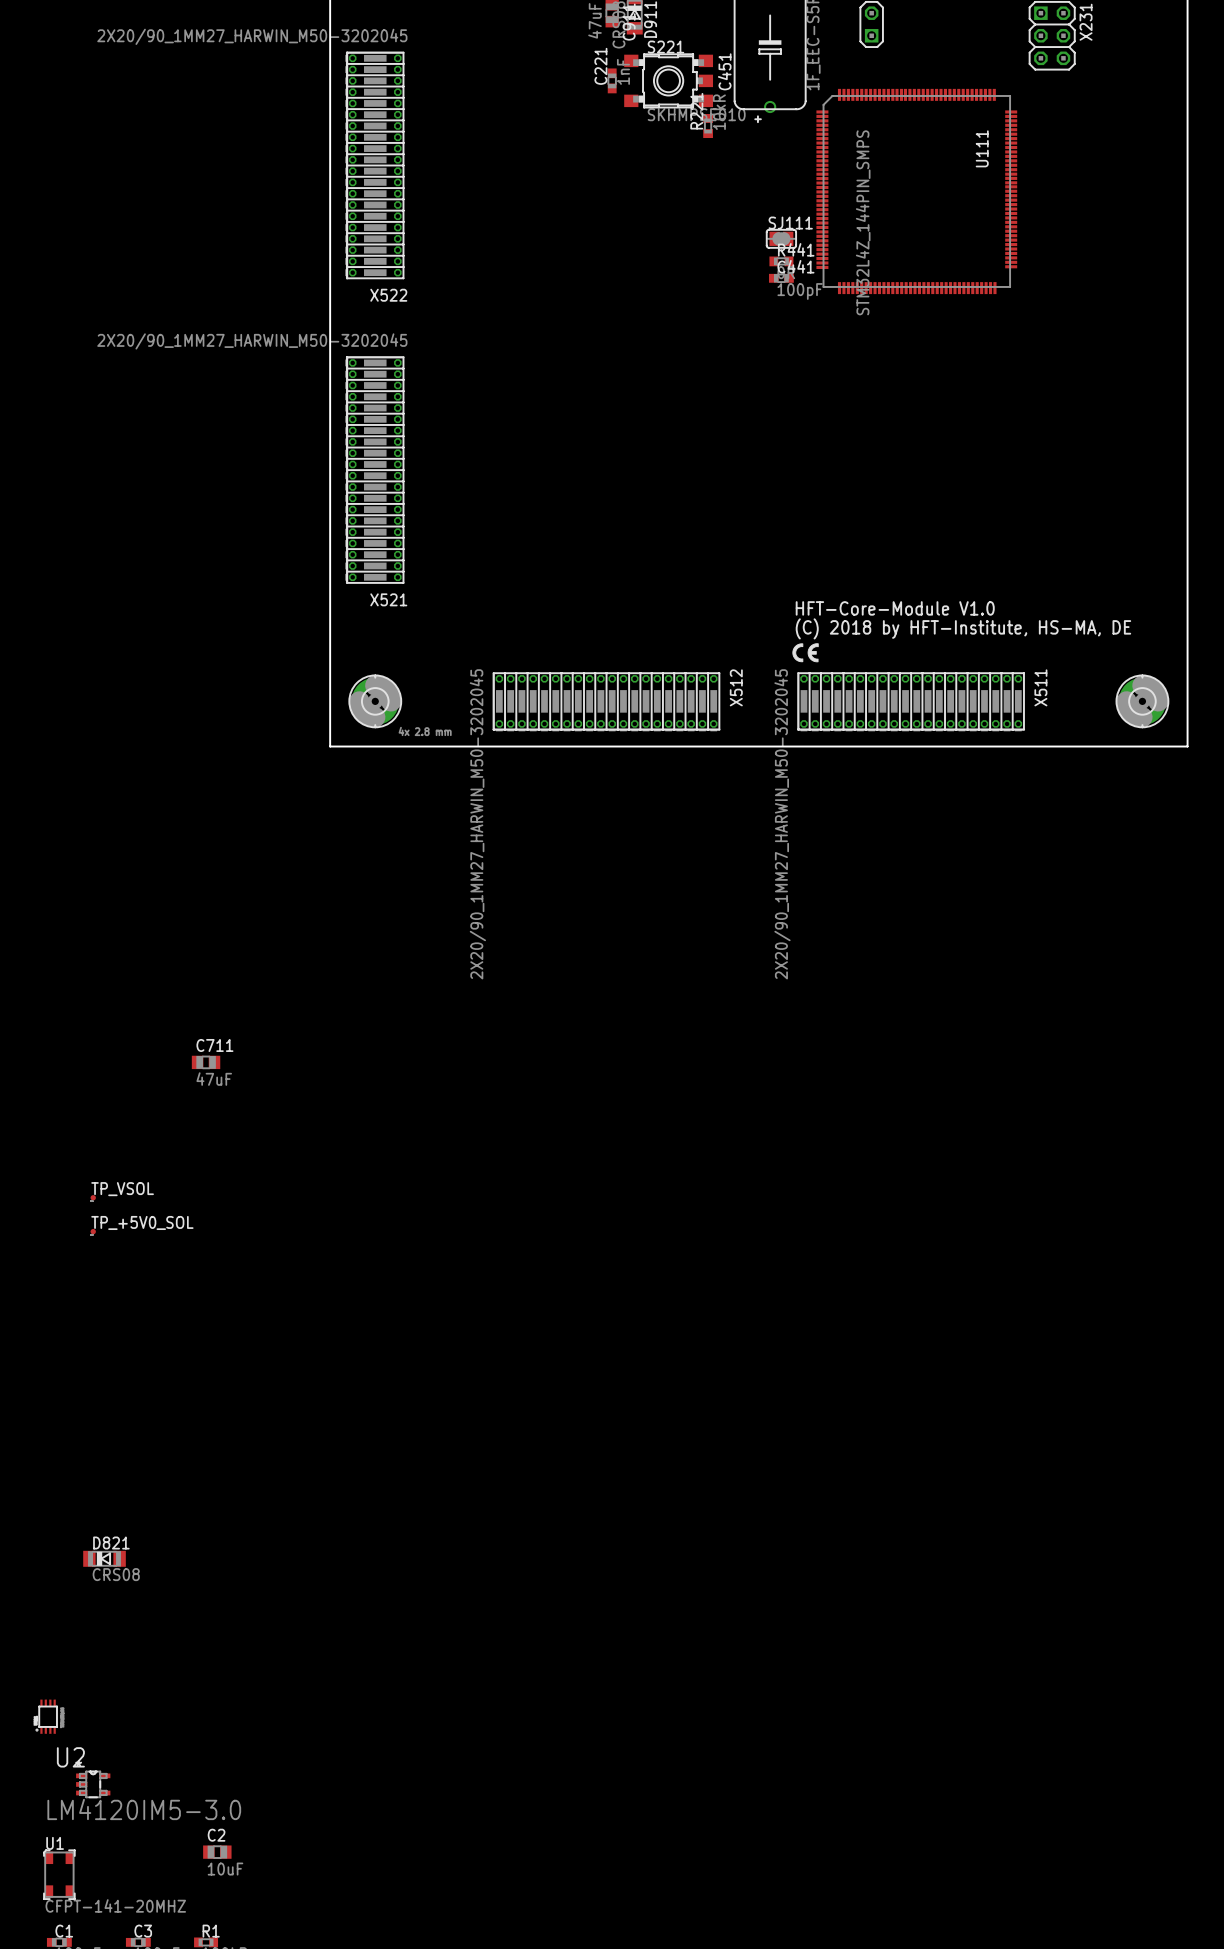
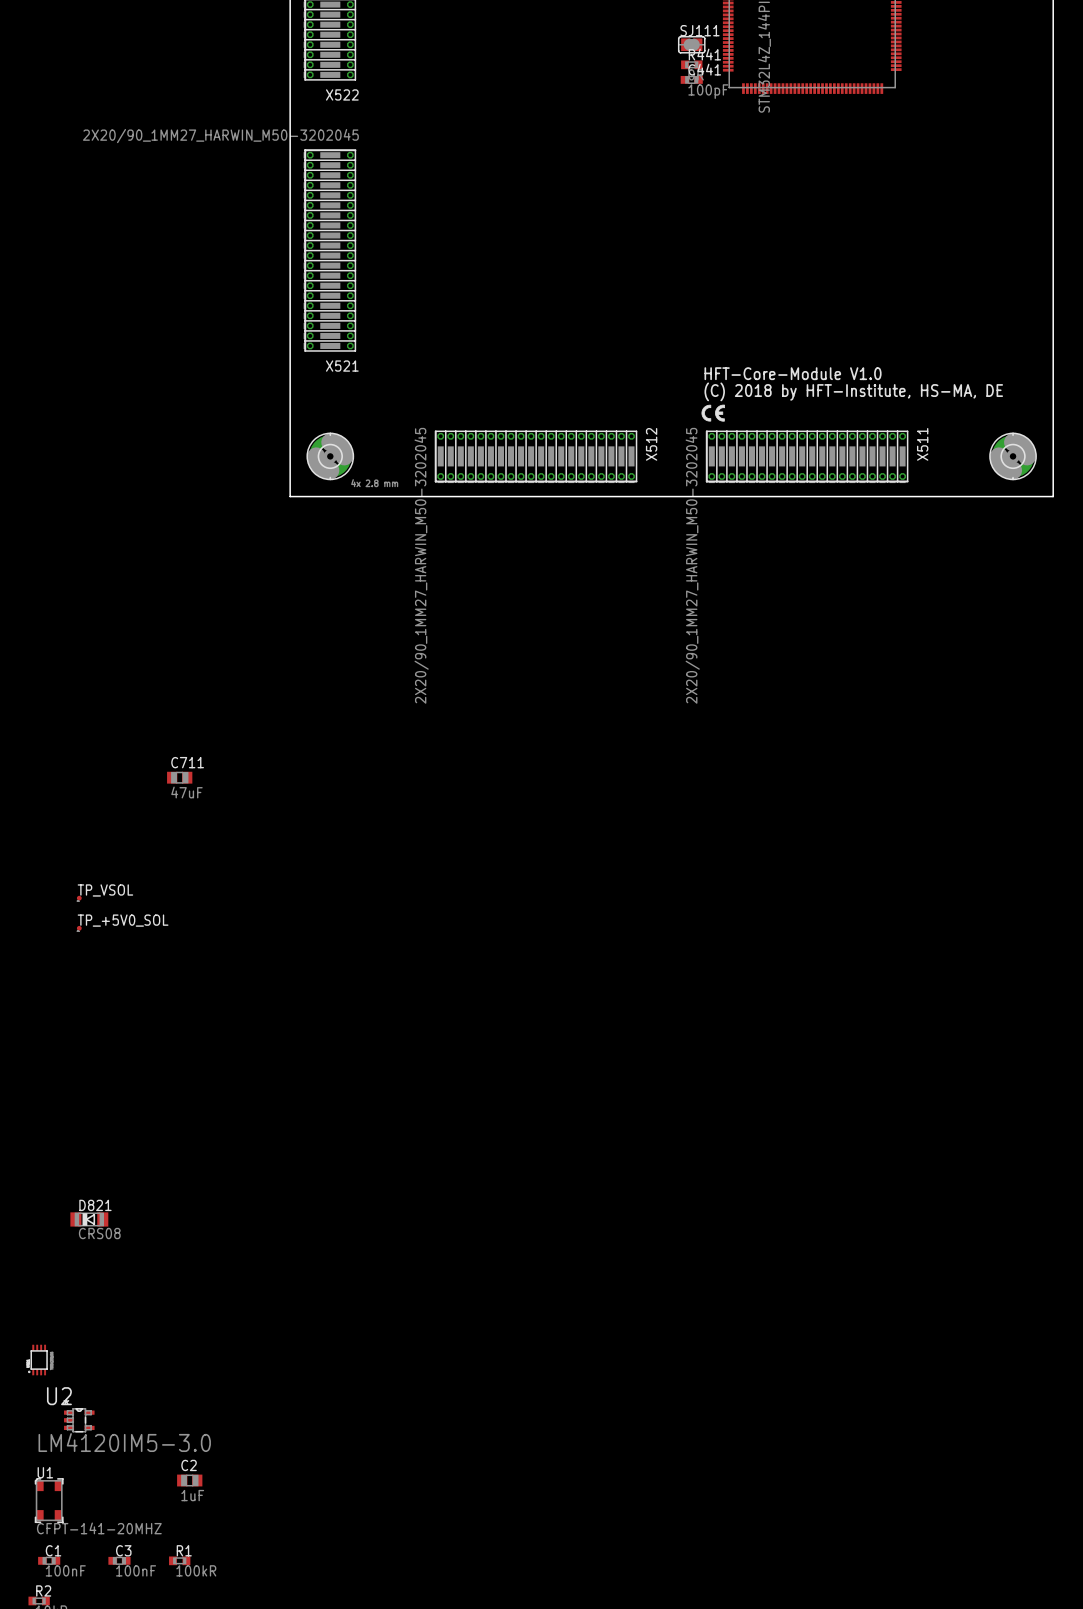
C2 value: 10uF (225, 1869) -> 1uF (192, 1495)

